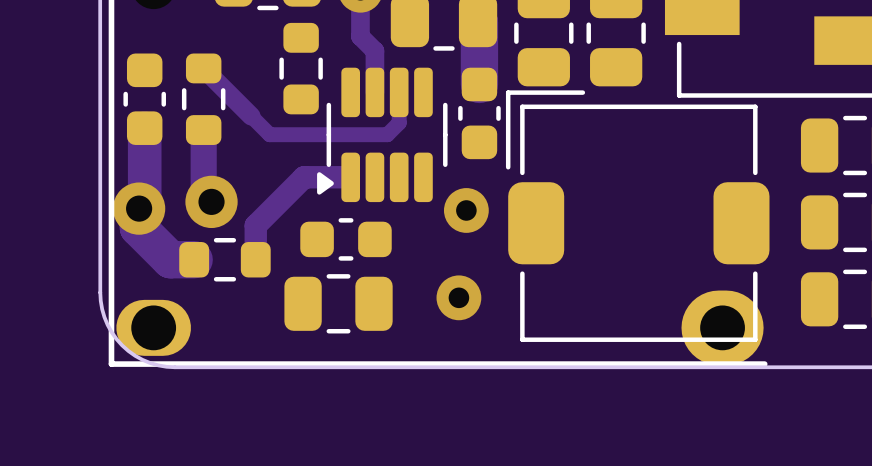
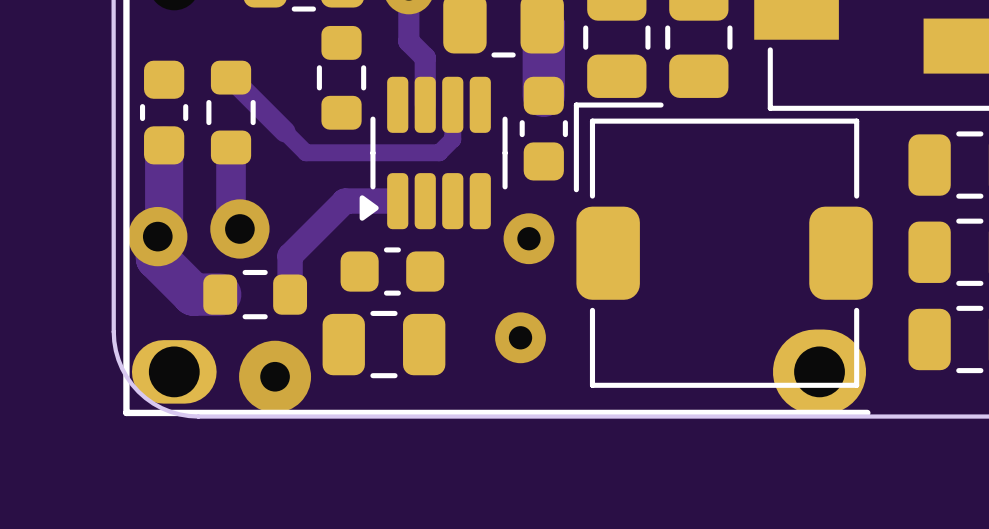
via: none -> (275, 376)

